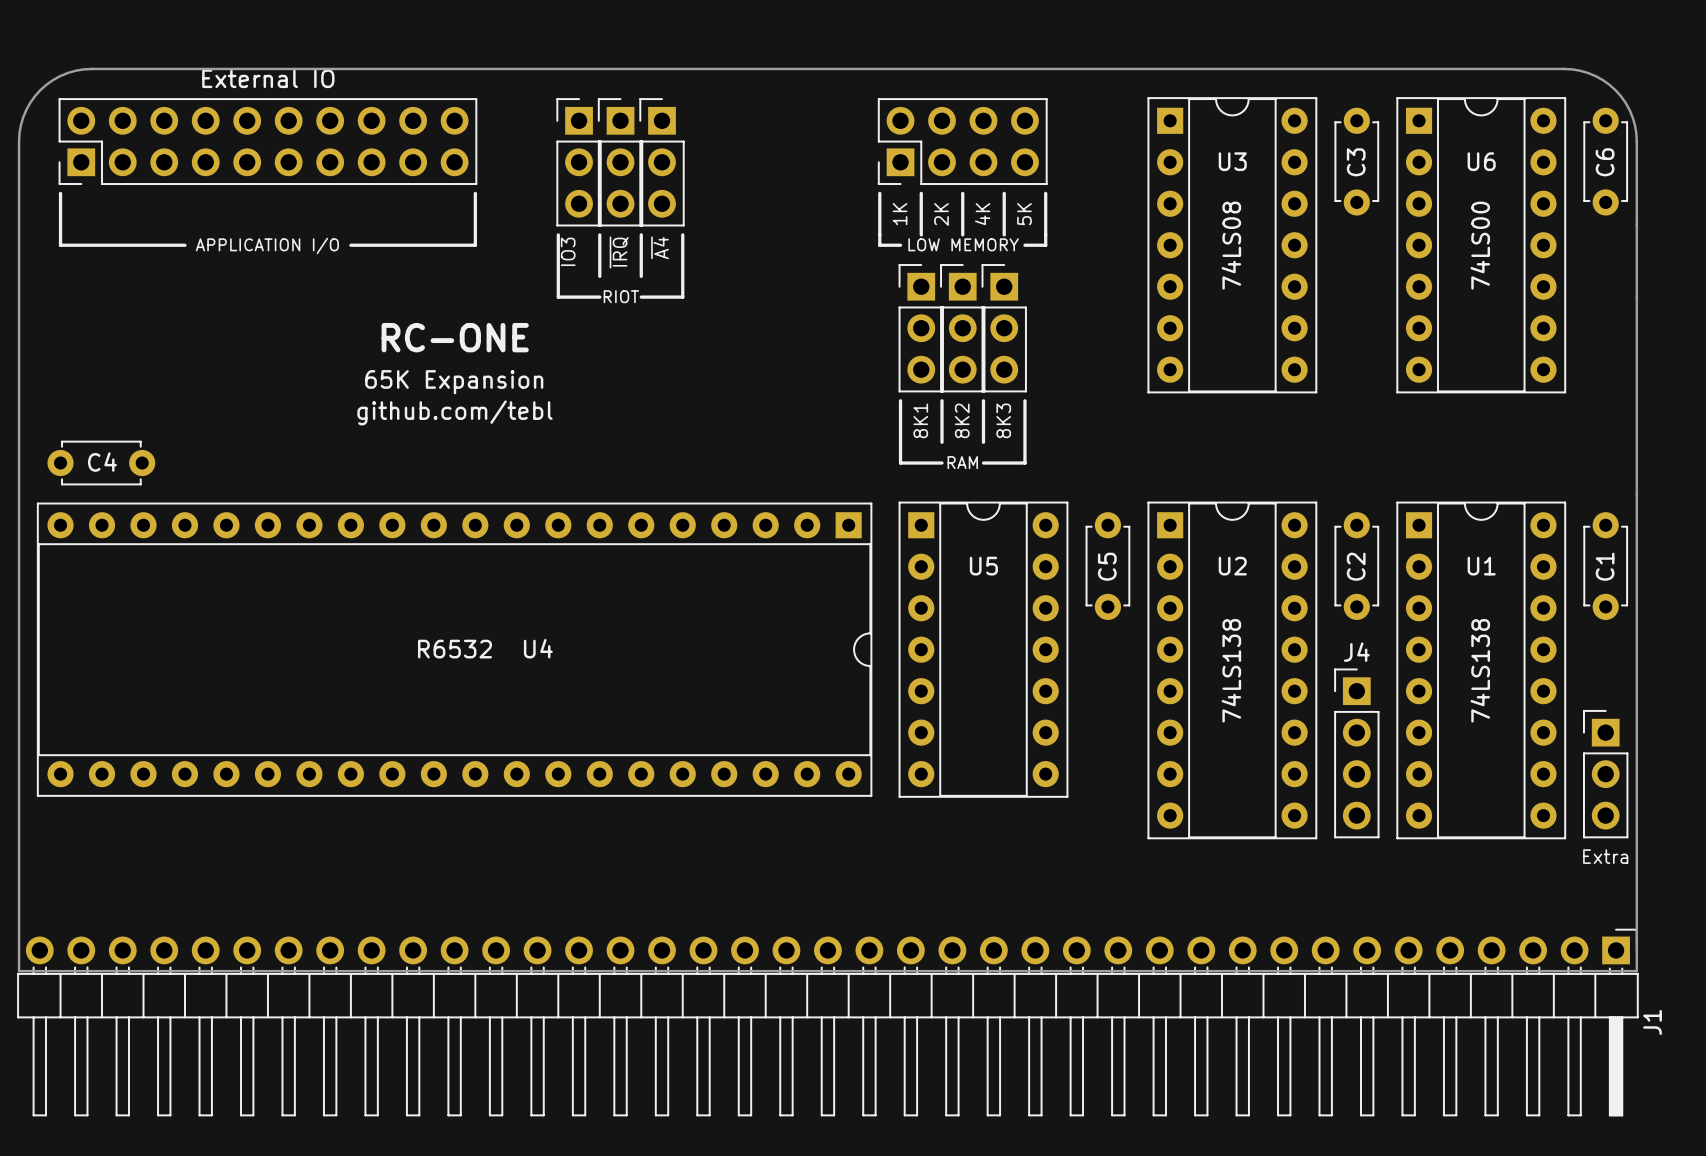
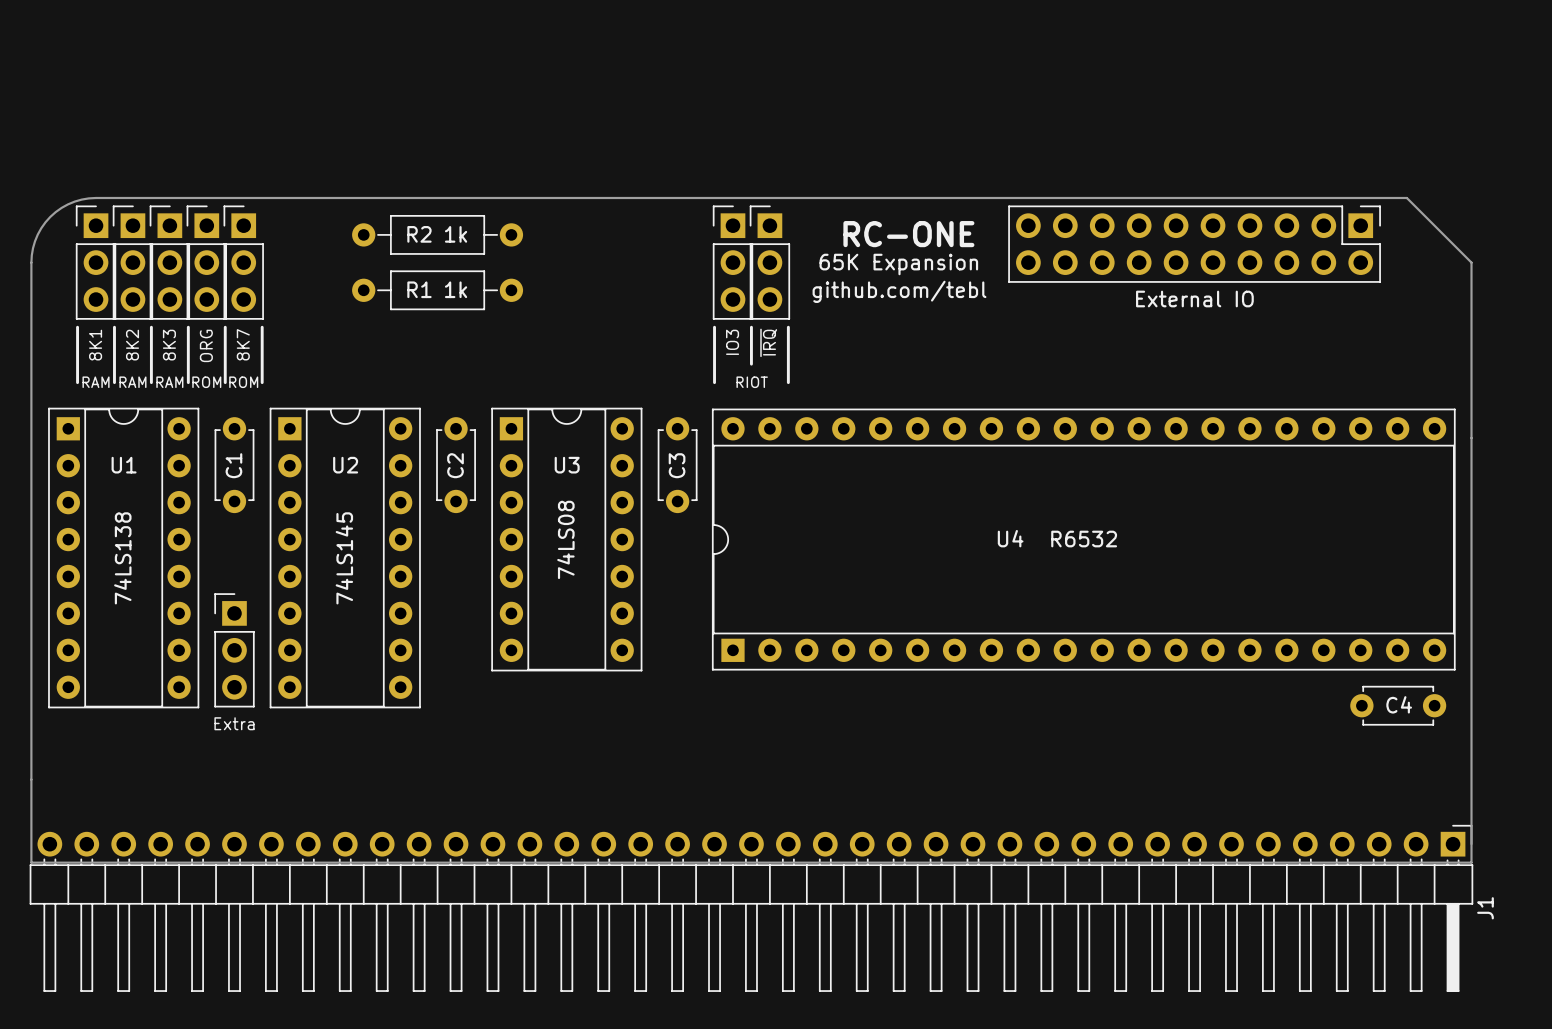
part: External IO (267, 141) -> none
part: (962, 141) -> none
C3 position: (1356, 161) -> (677, 465)
C6: (1605, 161) -> none
part: (579, 162) -> none
part: (620, 162) -> none
part: (662, 162) -> none
line: (60, 193) (60, 245) (184, 245) -> none
line: (475, 193) (475, 245) (350, 245) -> none
line: (879, 193) (879, 245) (900, 245) -> none
line: (921, 193) (921, 234) -> none
line: (962, 193) (962, 234) -> none
line: (1004, 193) (1004, 234) -> none
line: (1045, 193) (1045, 245) (1024, 245) -> none
text: 1K (900, 214) -> none
text: 2K (941, 214) -> none
text: 4K (982, 214) -> none
text: 5K (1024, 214) -> none
line: (558, 234) (558, 297) (599, 297) -> none
line: (599, 234) (599, 276) -> none
line: (641, 234) (641, 276) -> none
line: (682, 234) (682, 297) (641, 297) -> none
text: LOW MEMORY (963, 244) -> none
text: APPLICATION I/O (267, 245) -> none
U3 position: (1232, 245) -> (566, 539)
U6: 74LS00 (1481, 245) -> none
text: ~{A4} (660, 247) -> none
text position: IO3 (568, 251) -> IO3 (732, 342)
text position: ~{IRQ} (619, 252) -> ~{IRQ} (768, 342)
R2: none -> 1k (437, 234)
text: none -> RC-ONE (908, 234)
part: none -> External IO (1194, 244)
text position: RIOT (621, 296) -> RIOT (752, 382)
board edge: (19, 297) (19, 141) (23, 117) (34, 96) (53, 80) (75, 70) (91, 68) (1572, 69) (1595, 76) (1609, 84) (1625, 102) (1634, 125) (1636, 141) (1636, 297) -> (31, 262) (35, 241) (41, 228) (50, 216) (61, 207) (74, 201) (96, 197) (1406, 197) (1471, 262)
part: none -> (96, 262)
part: none -> (132, 262)
part: none -> (169, 262)
part: none -> (206, 262)
part: none -> (243, 262)
part: none -> (732, 262)
part: none -> (769, 262)
text: none -> 65K Expansion (898, 264)
R1: none -> 1k (437, 290)
part: (921, 328) -> none
part: (962, 328) -> none
part: (1004, 328) -> none
text: none -> github.com/tebl (899, 291)
text: RC-ONE (455, 337) -> none
line: none -> (77, 327) (77, 382)
line: none -> (114, 327) (114, 382)
line: none -> (151, 327) (151, 382)
line: none -> (188, 327) (188, 382)
line: none -> (225, 327) (225, 382)
line: none -> (262, 327) (262, 382)
line: none -> (714, 327) (714, 382)
line: none -> (788, 327) (788, 382)
text: 65K Expansion (454, 382) -> none
text: none -> 8K1 (95, 345)
text: none -> 8K2 (132, 345)
text: none -> 8K3 (169, 345)
text: none -> 8K7 (243, 344)
text: none -> ORG (206, 345)
line: (900, 400) (900, 463) (942, 463) -> none
line: (942, 400) (942, 442) -> (751, 327) (751, 364)
line: (983, 400) (983, 442) -> none
line: (1024, 400) (1024, 463) (983, 463) -> none
text: github.com/tebl (454, 412) -> none
text: 8K1 (920, 420) -> none
text: 8K2 (962, 420) -> none
text: 8K3 (1003, 420) -> none
text: none -> RAM (96, 382)
text: none -> RAM (132, 382)
text: none -> RAM (169, 382)
text: none -> ROM (206, 382)
text: none -> ROM (243, 382)
text: RAM (962, 462) -> none
C4 position: (101, 463) -> (1398, 705)
C5: (1107, 566) -> none
C2 position: (1356, 566) -> (456, 465)
C1 position: (1605, 566) -> (234, 465)
U4 rotation: 0° (454, 649) -> 180° (1083, 539)
U4 position: (454, 649) -> (1083, 539)
U5: (983, 649) -> none
U2 value: 74LS138 (1231, 670) -> 74LS145 (344, 558)
U2 position: (1232, 670) -> (345, 558)
U1 position: (1481, 670) -> (123, 558)
part: none -> Extra (234, 650)
J4: (1356, 753) -> none
part: Extra (1605, 774) -> none

